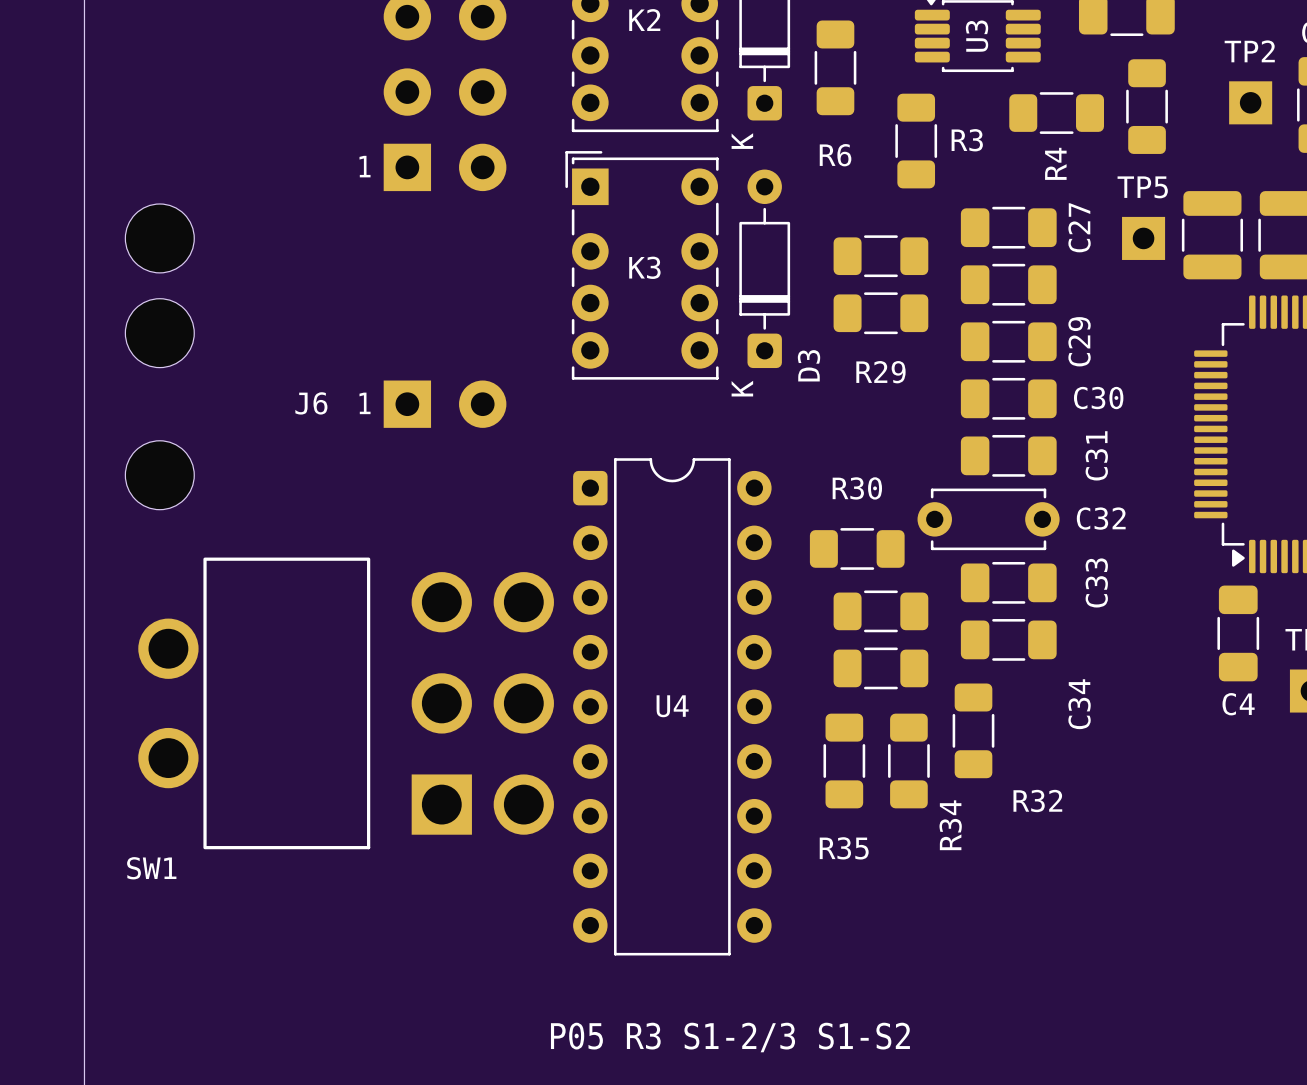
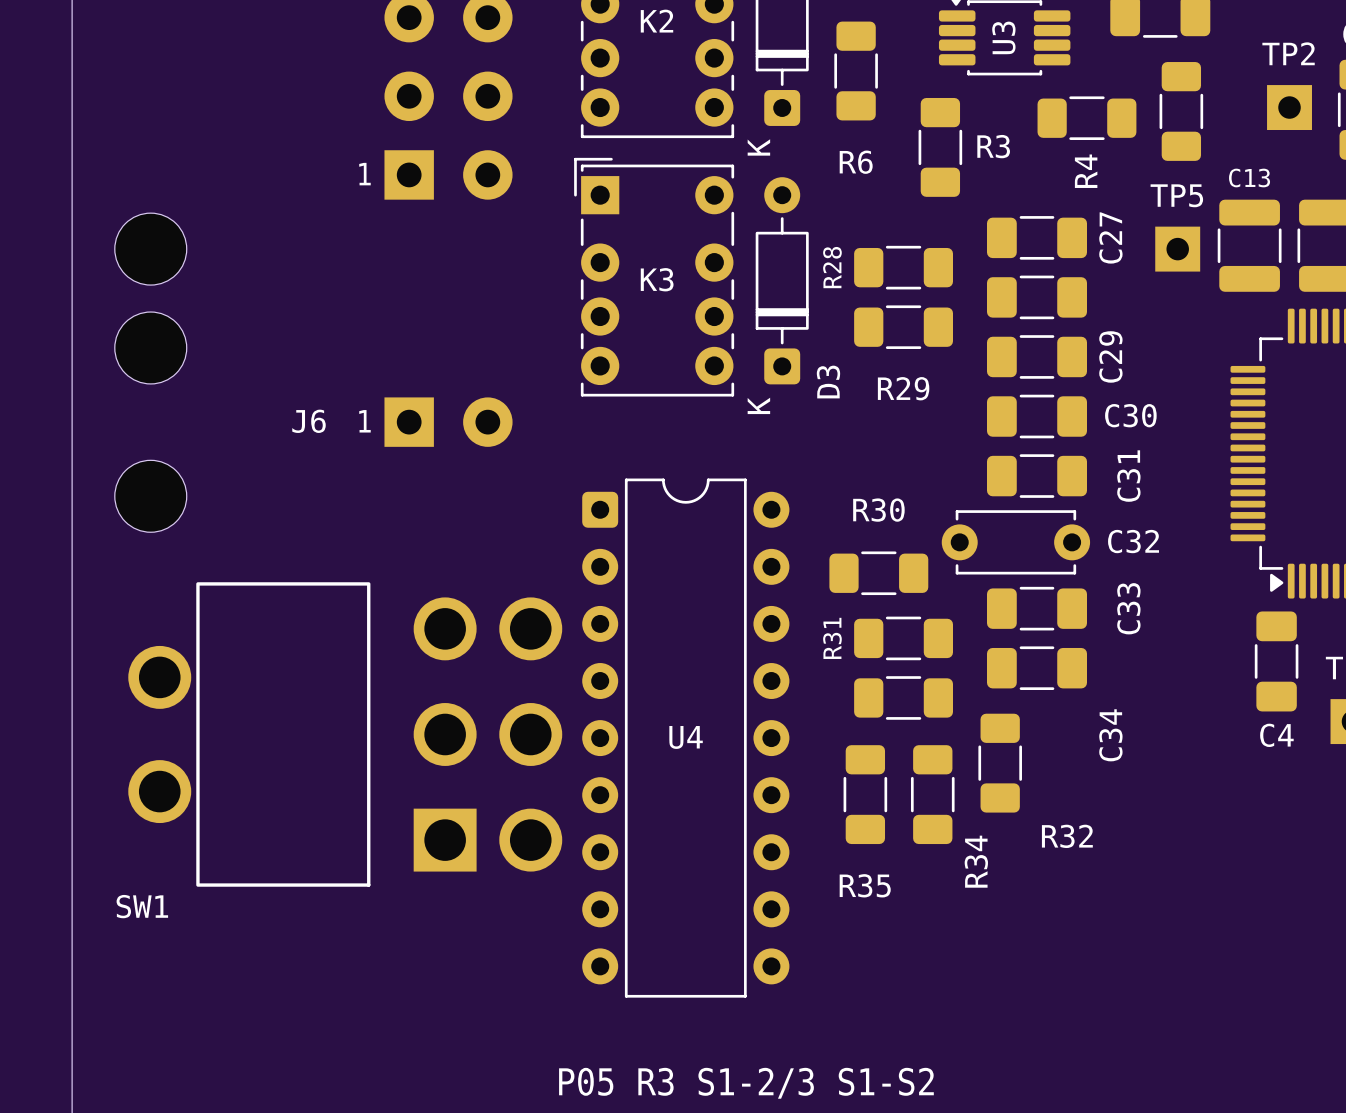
C13 name: none -> C13 (1249, 177)
R28 name: none -> R28 (832, 267)
R31 name: none -> R31 (832, 638)

